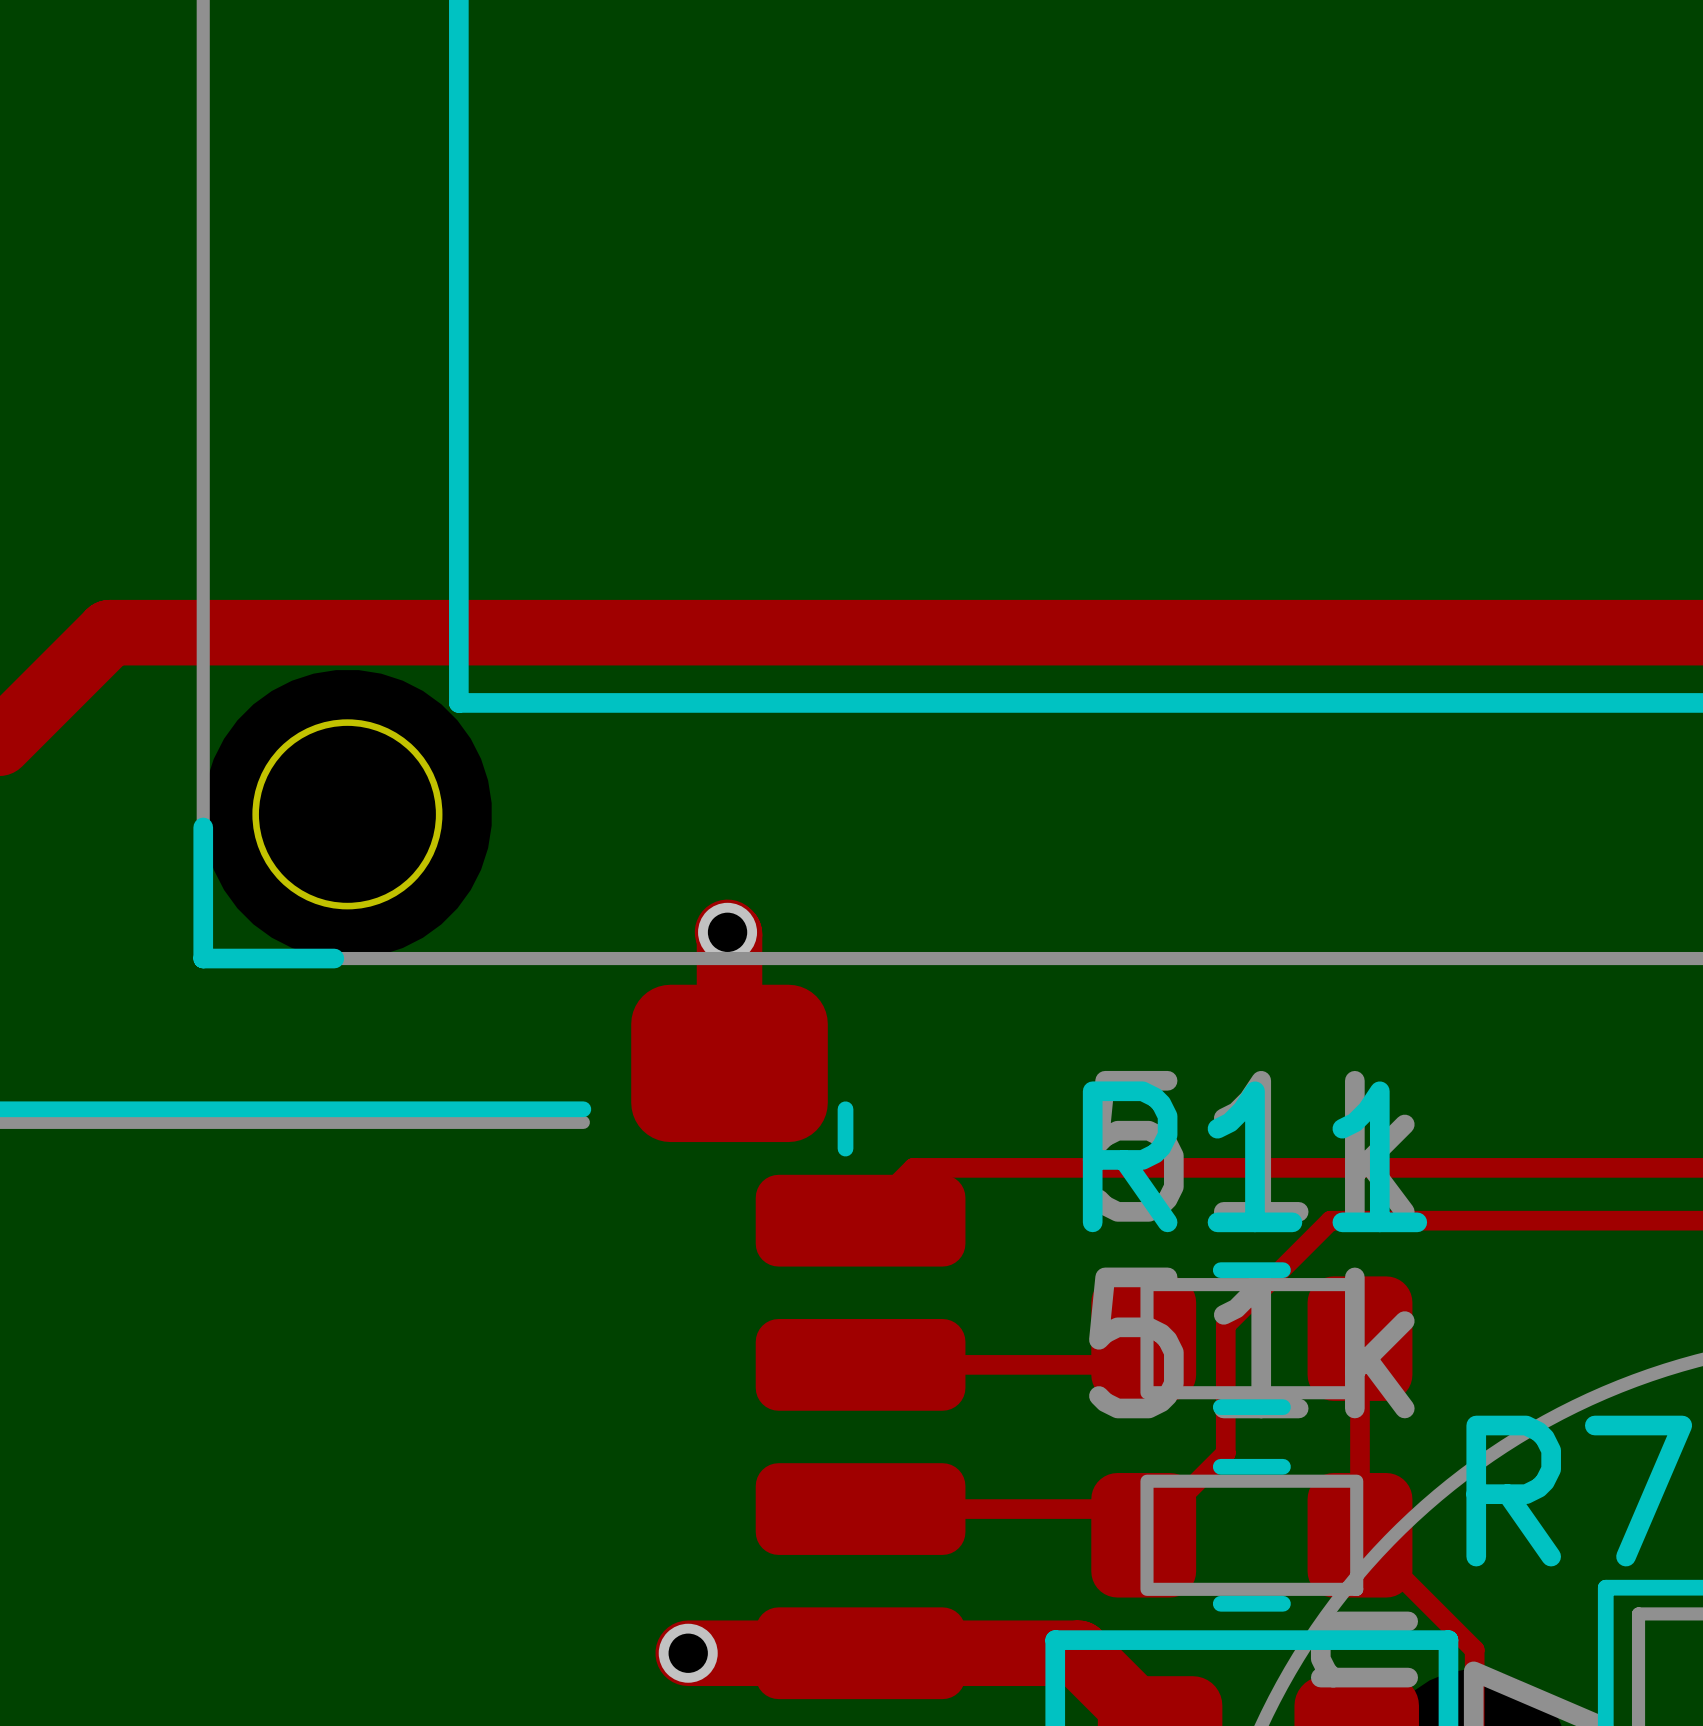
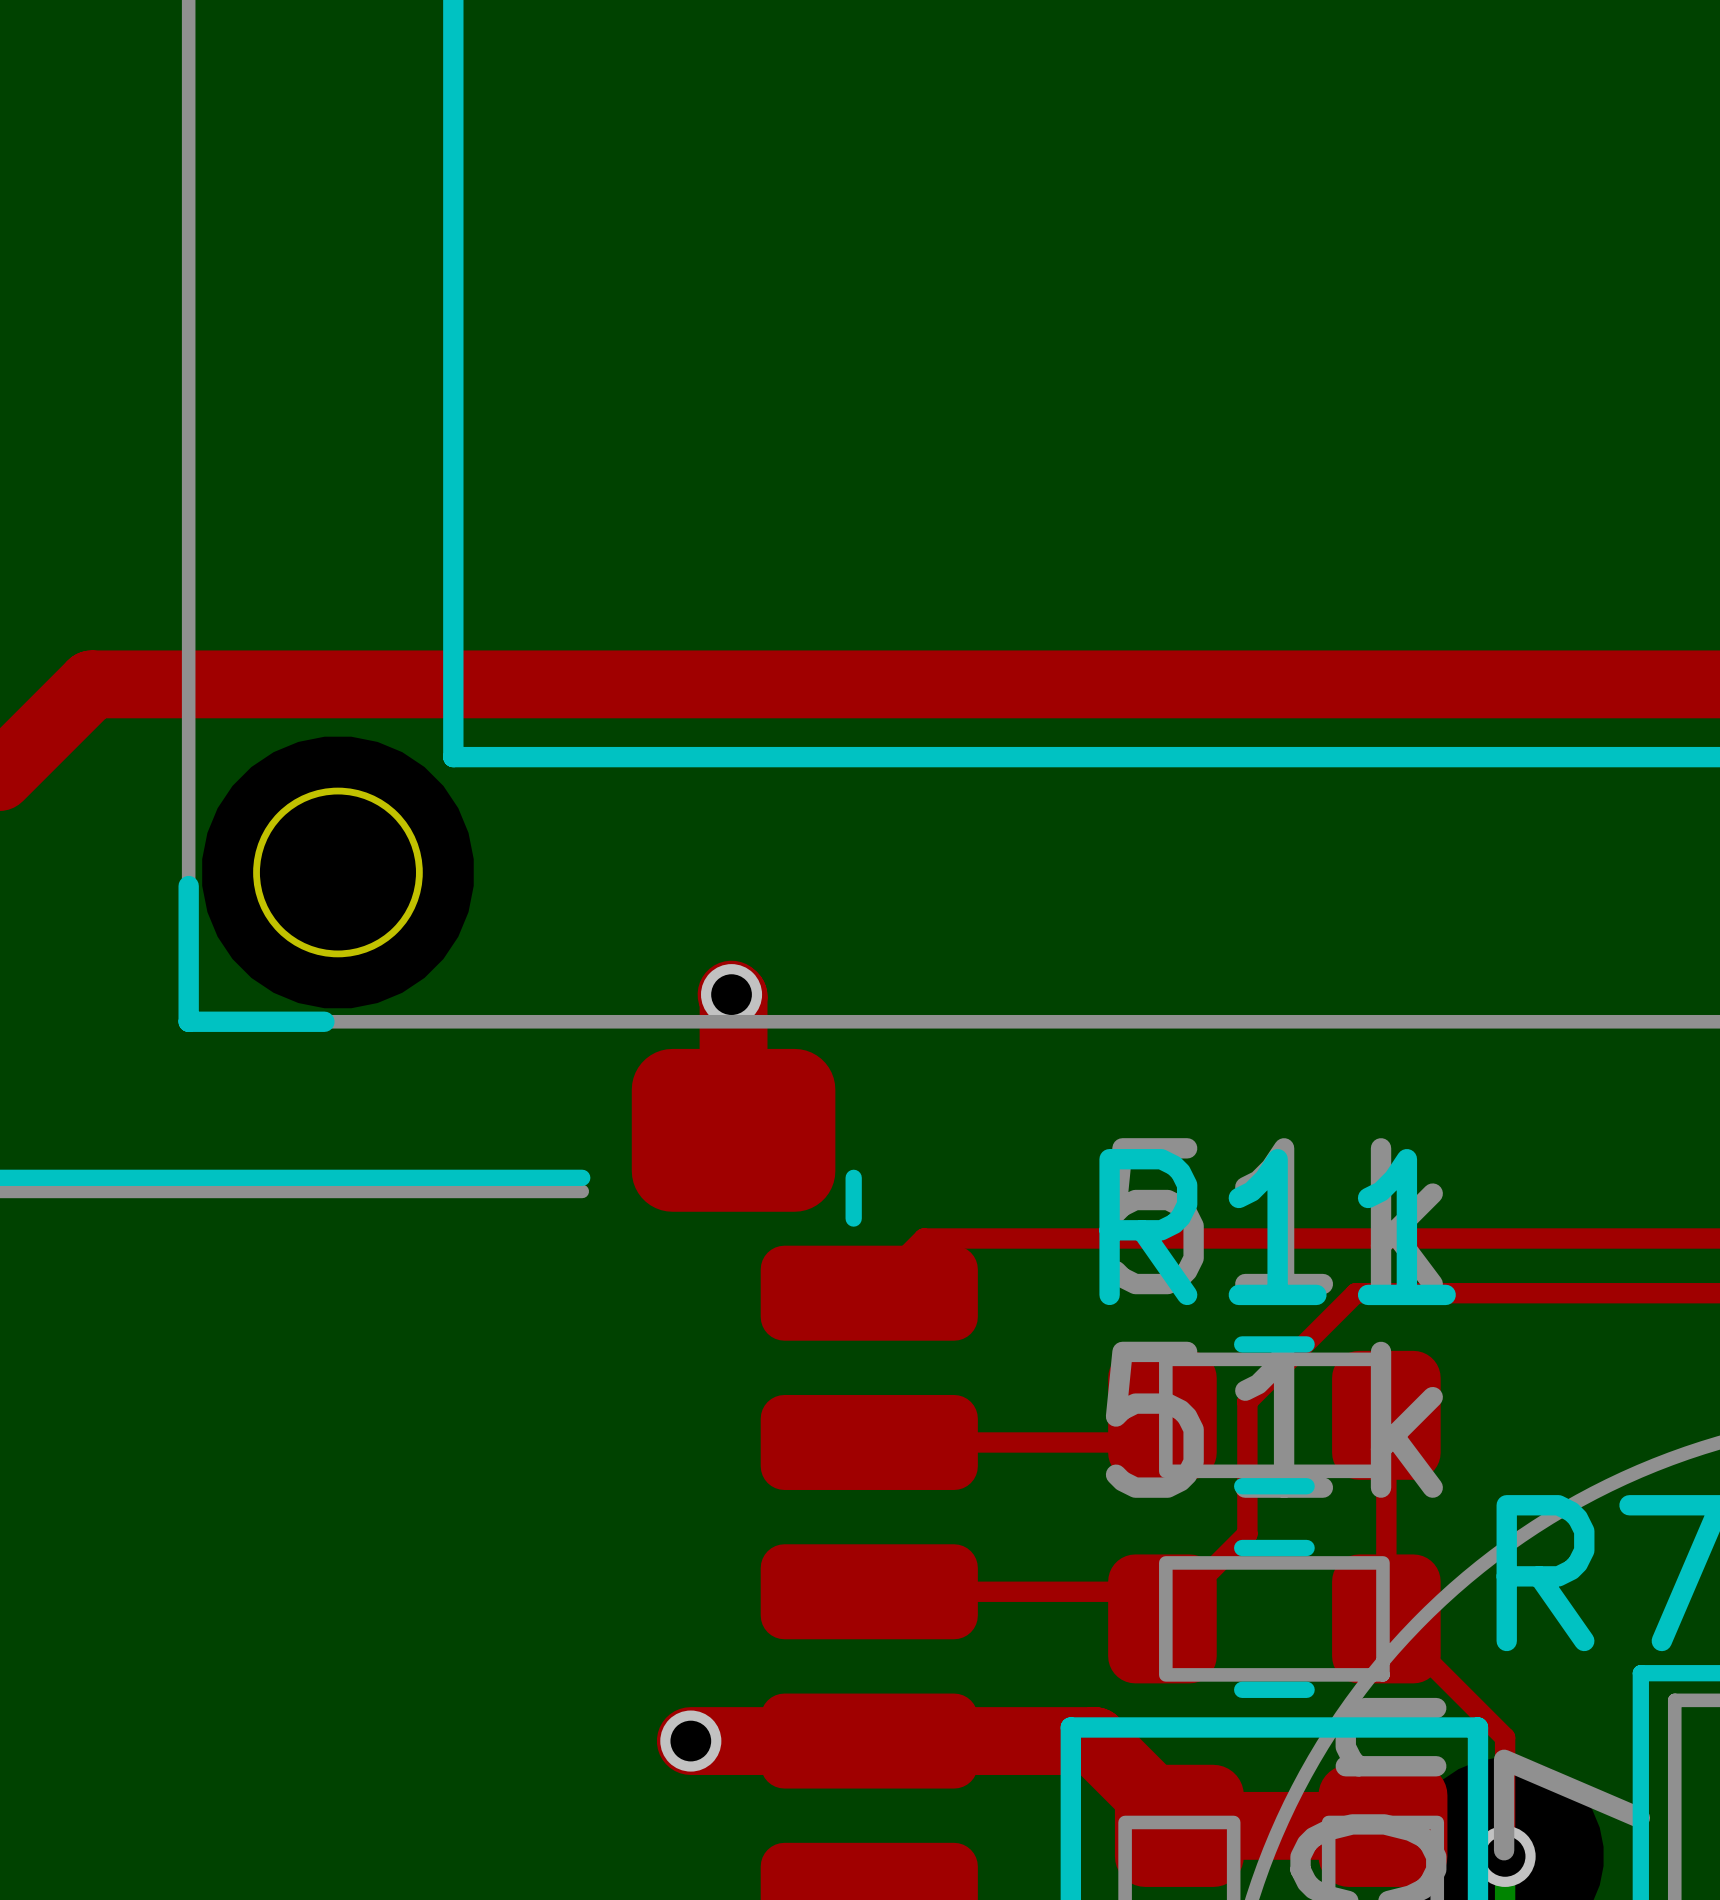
round board edge size: [252, 719, 443, 910] -> [253, 787, 423, 958]

